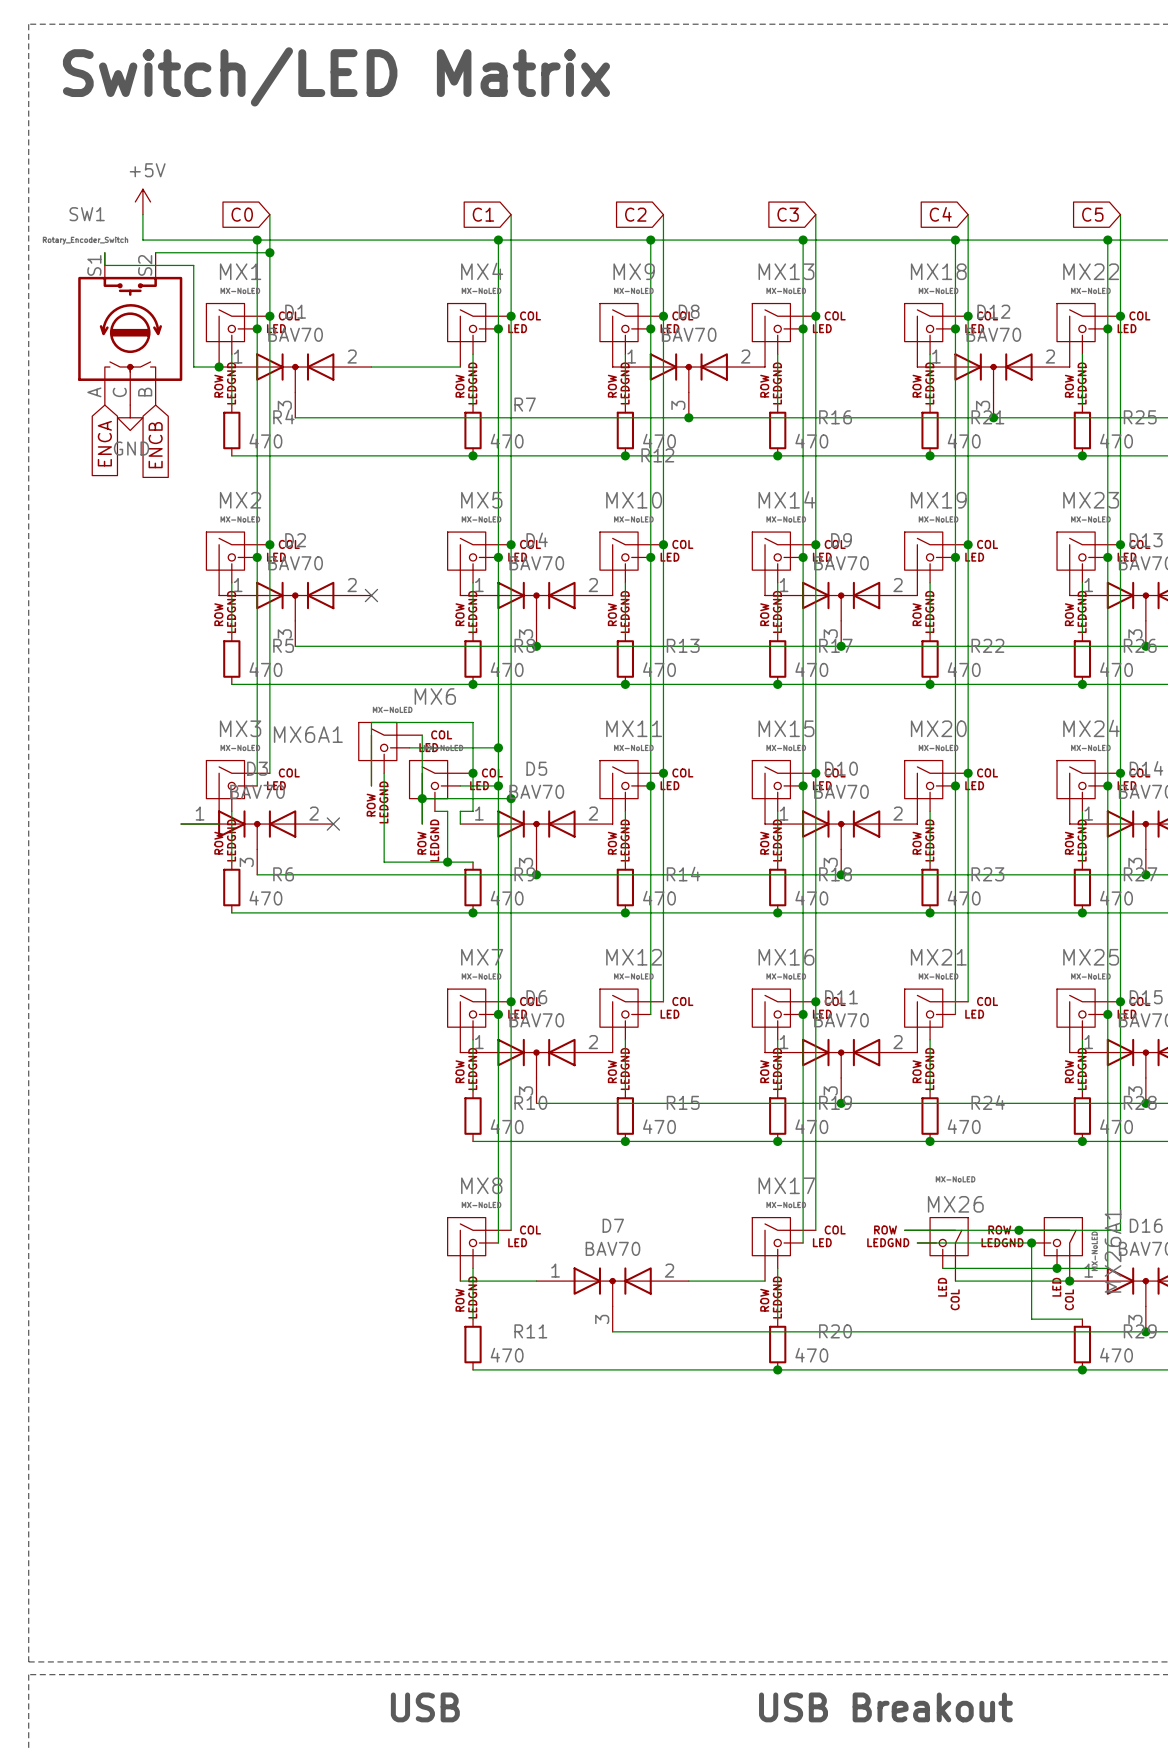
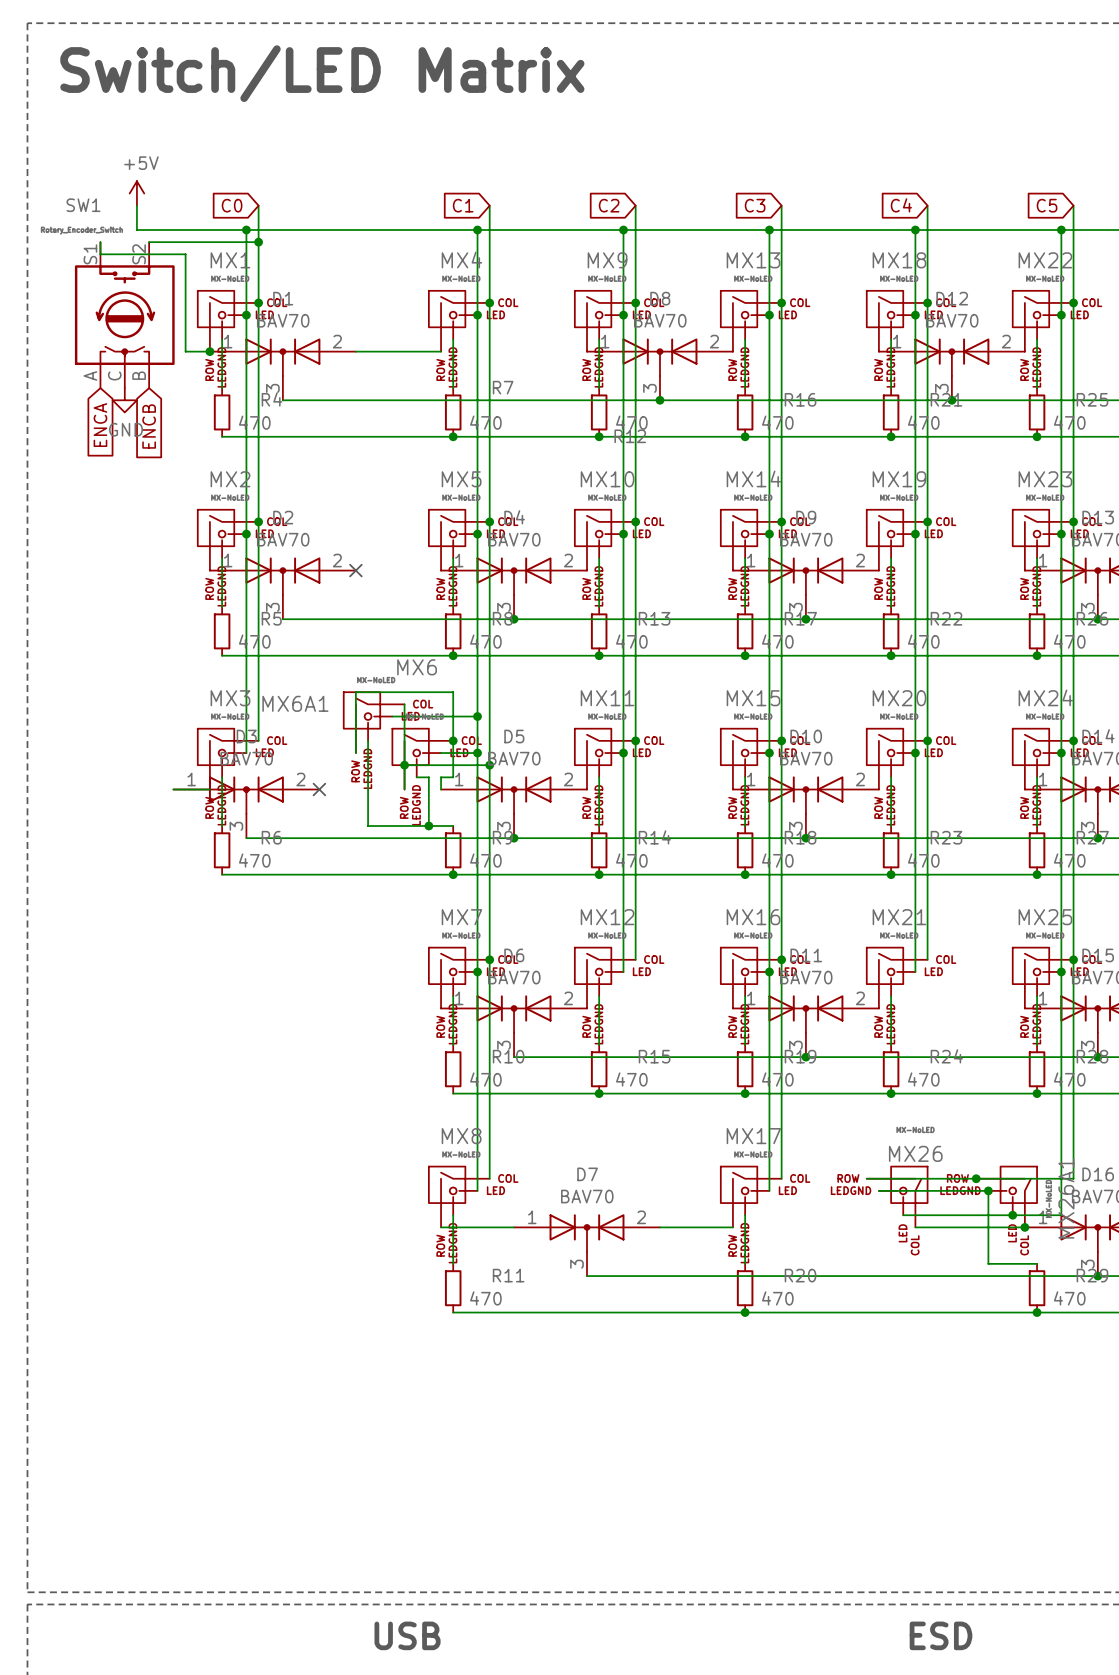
text: USB Breakout (885, 1707) -> none
text: none -> ESD (941, 1635)

